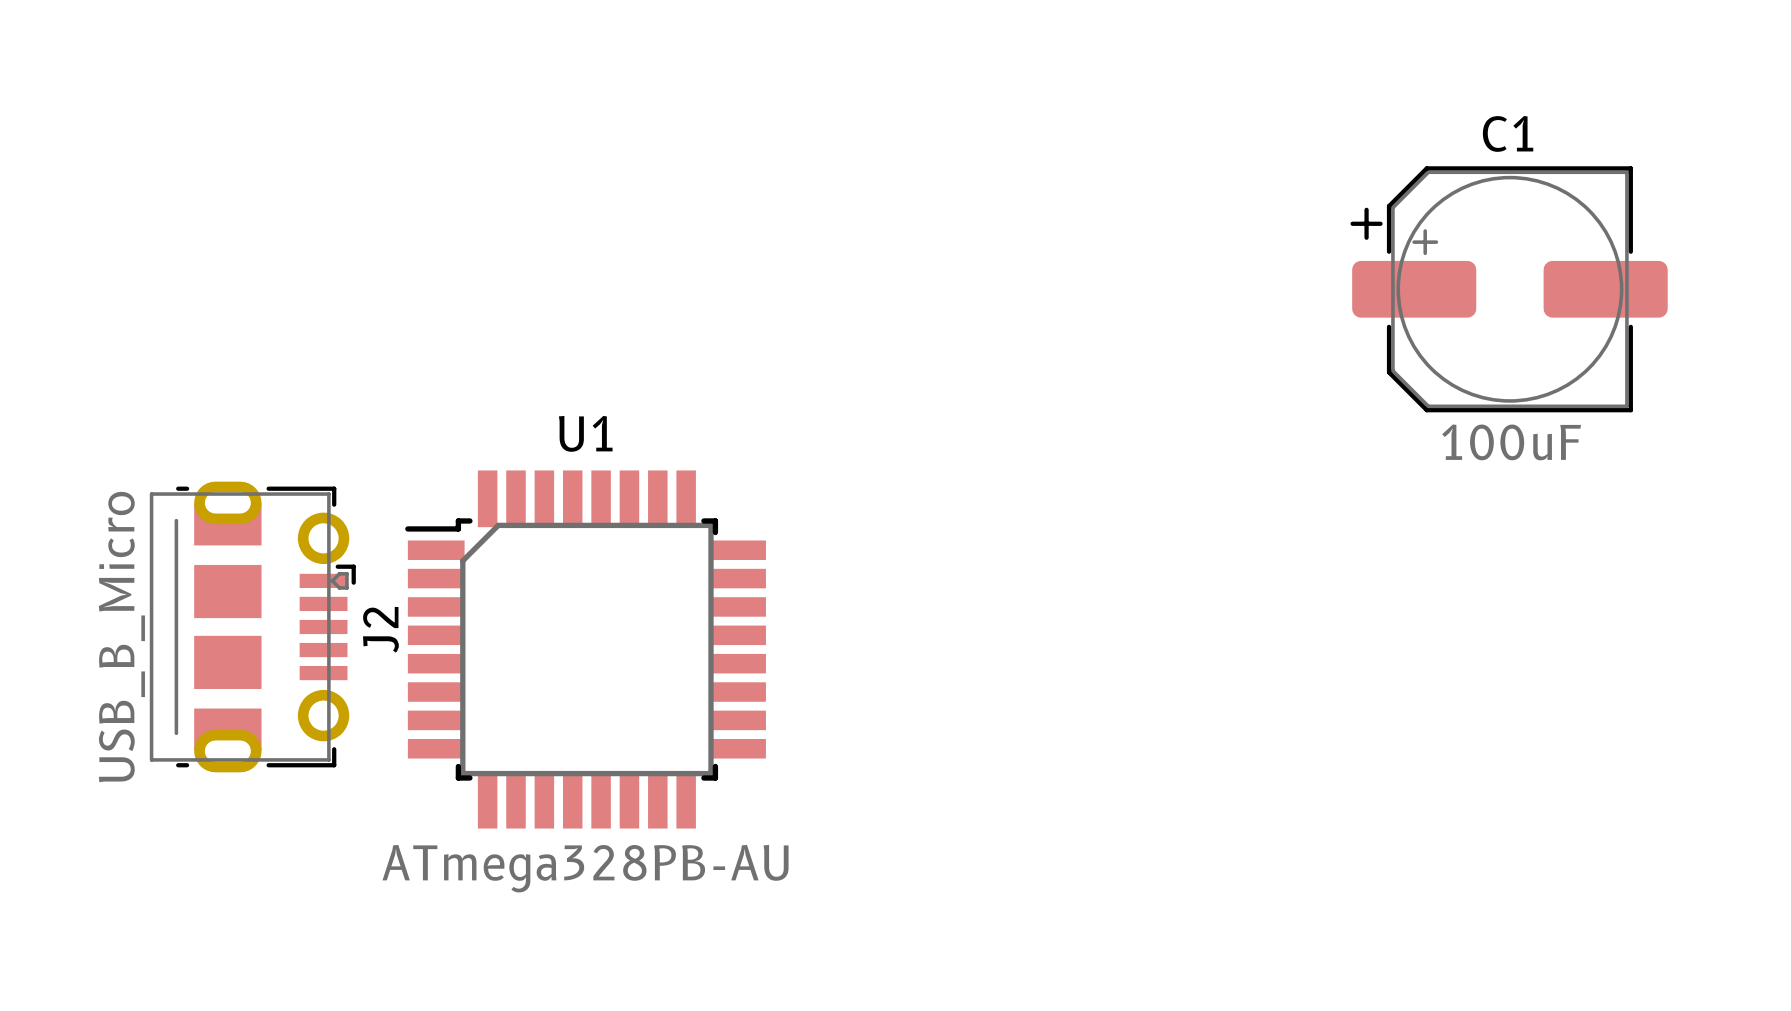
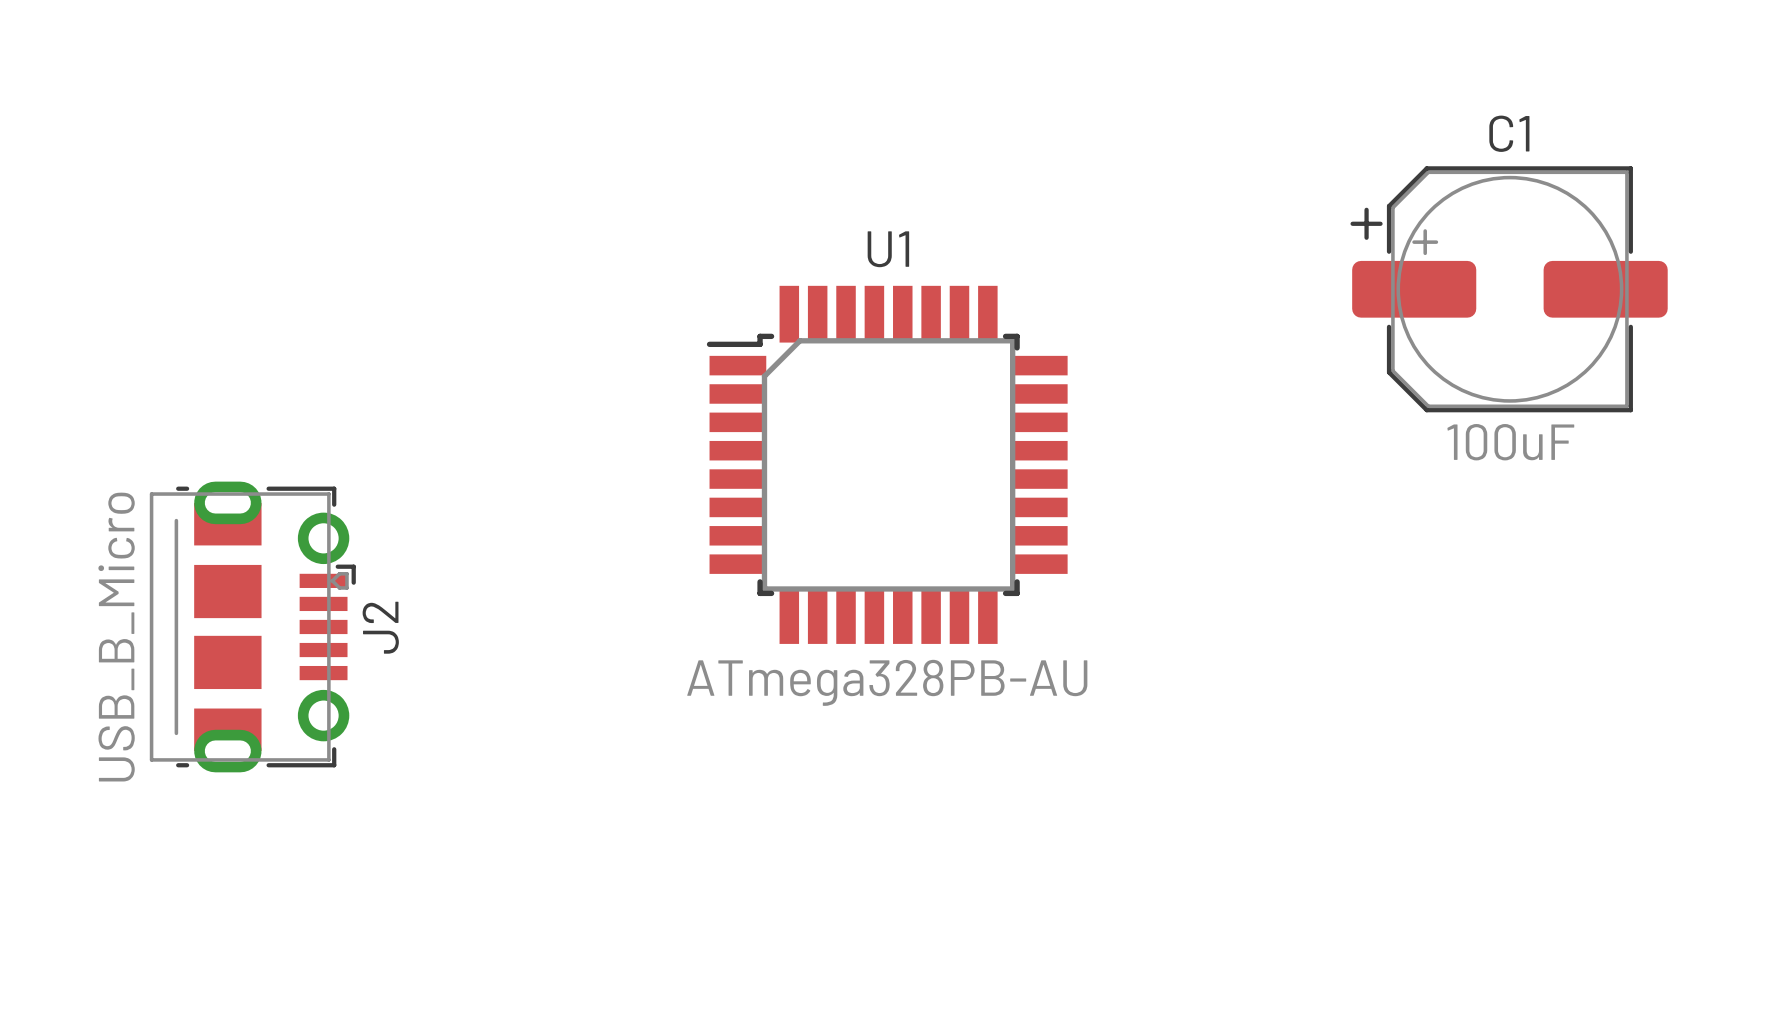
U1 position: (585, 649) -> (887, 464)

